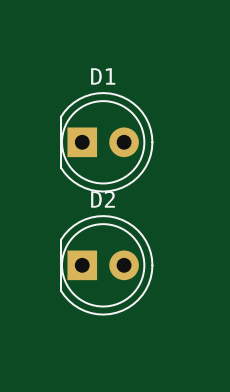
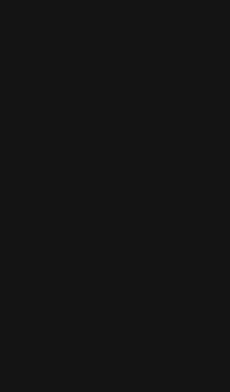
D1: (106, 142) -> none
D2: (106, 265) -> none

